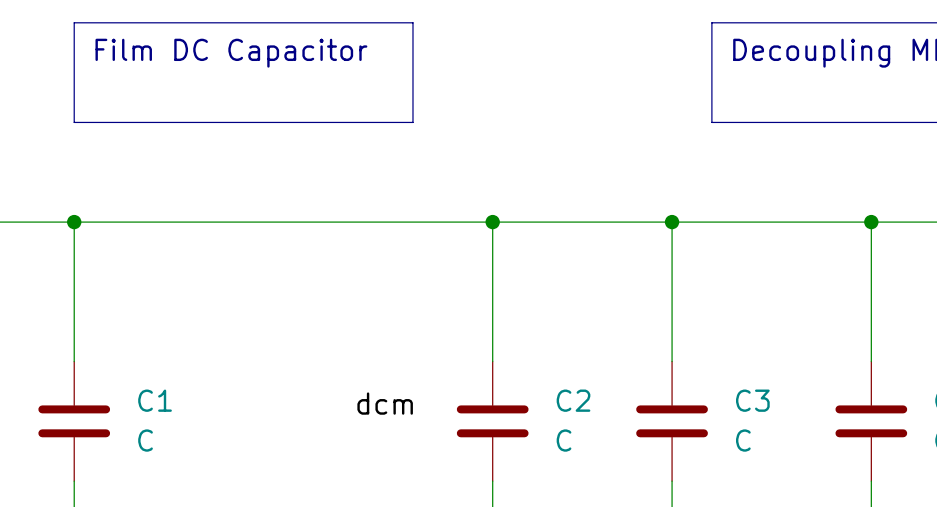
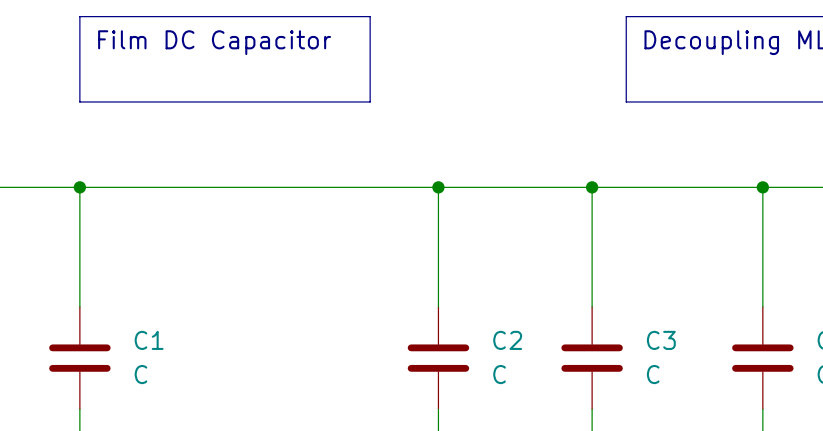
label: dcm (385, 403) -> none

